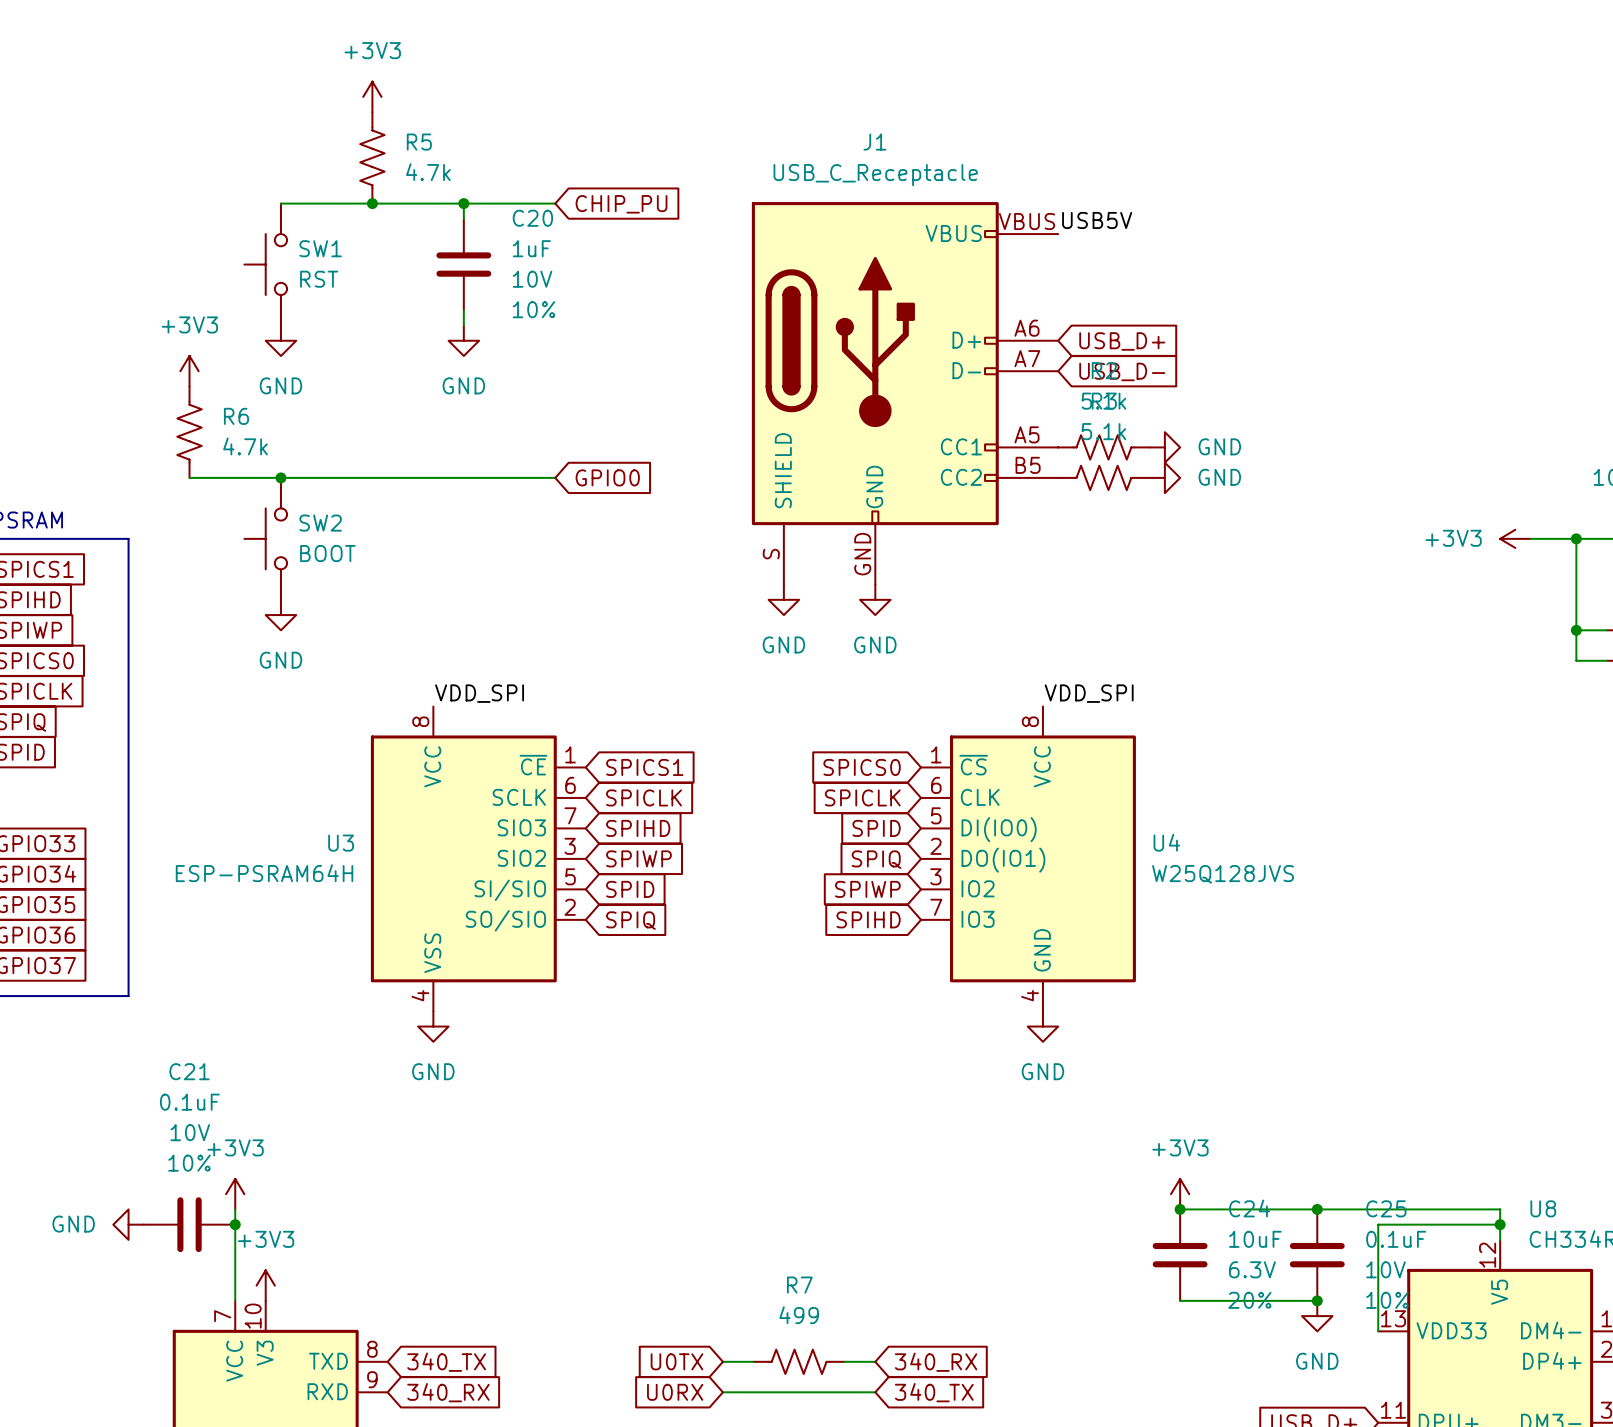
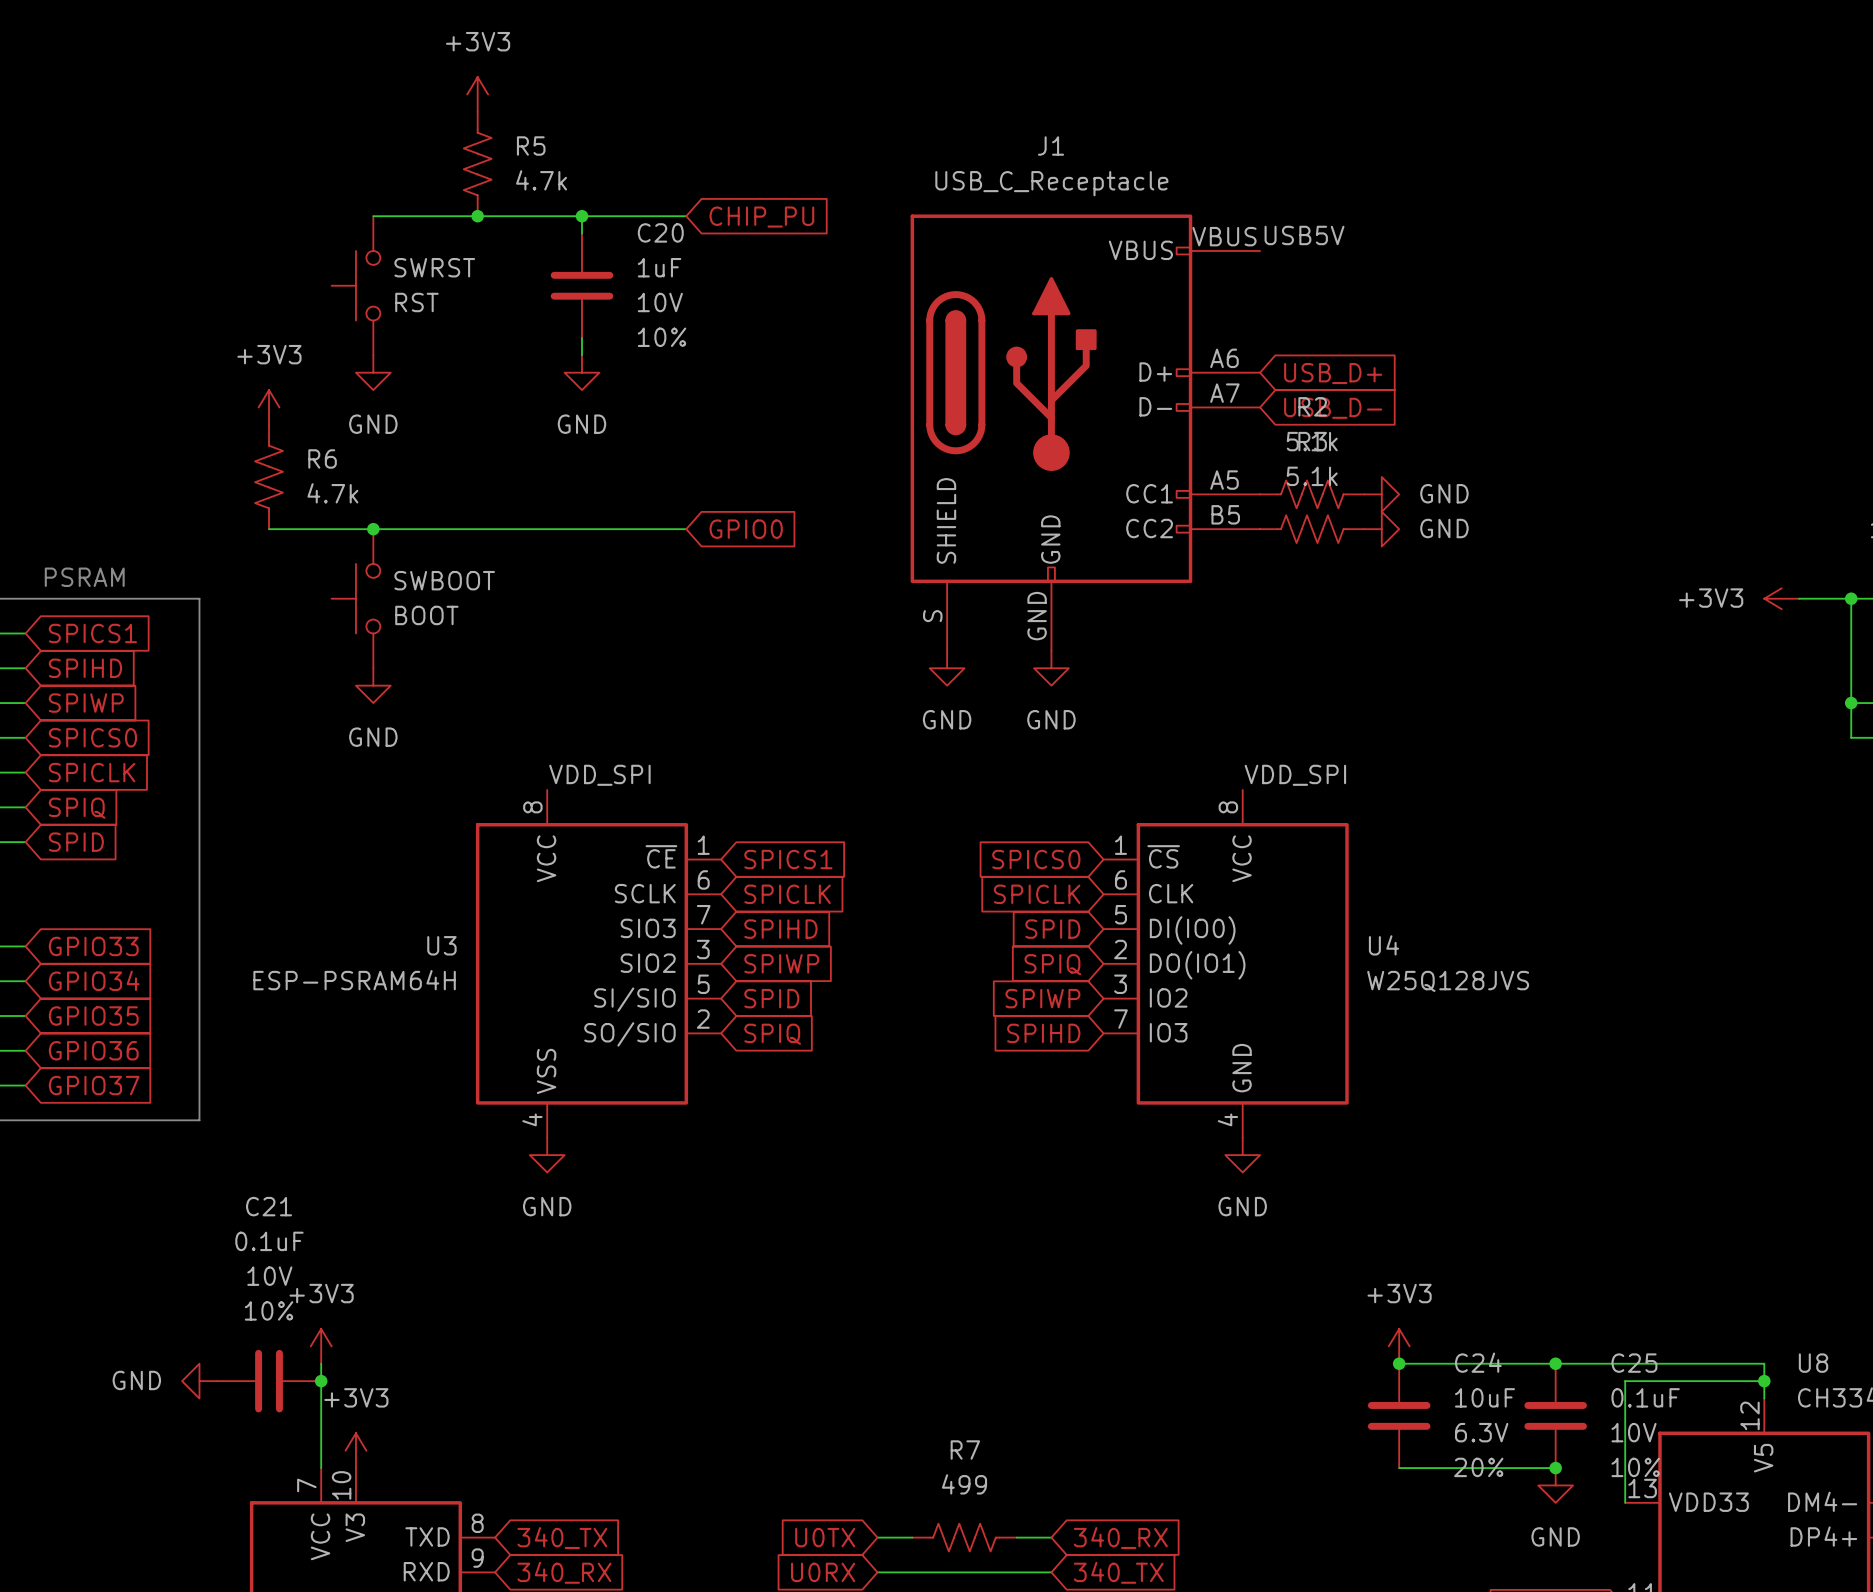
SW1 name: SW1 (320, 248) -> SWRST (434, 267)
SW2 name: SW2 (320, 523) -> SWBOOT (444, 580)

